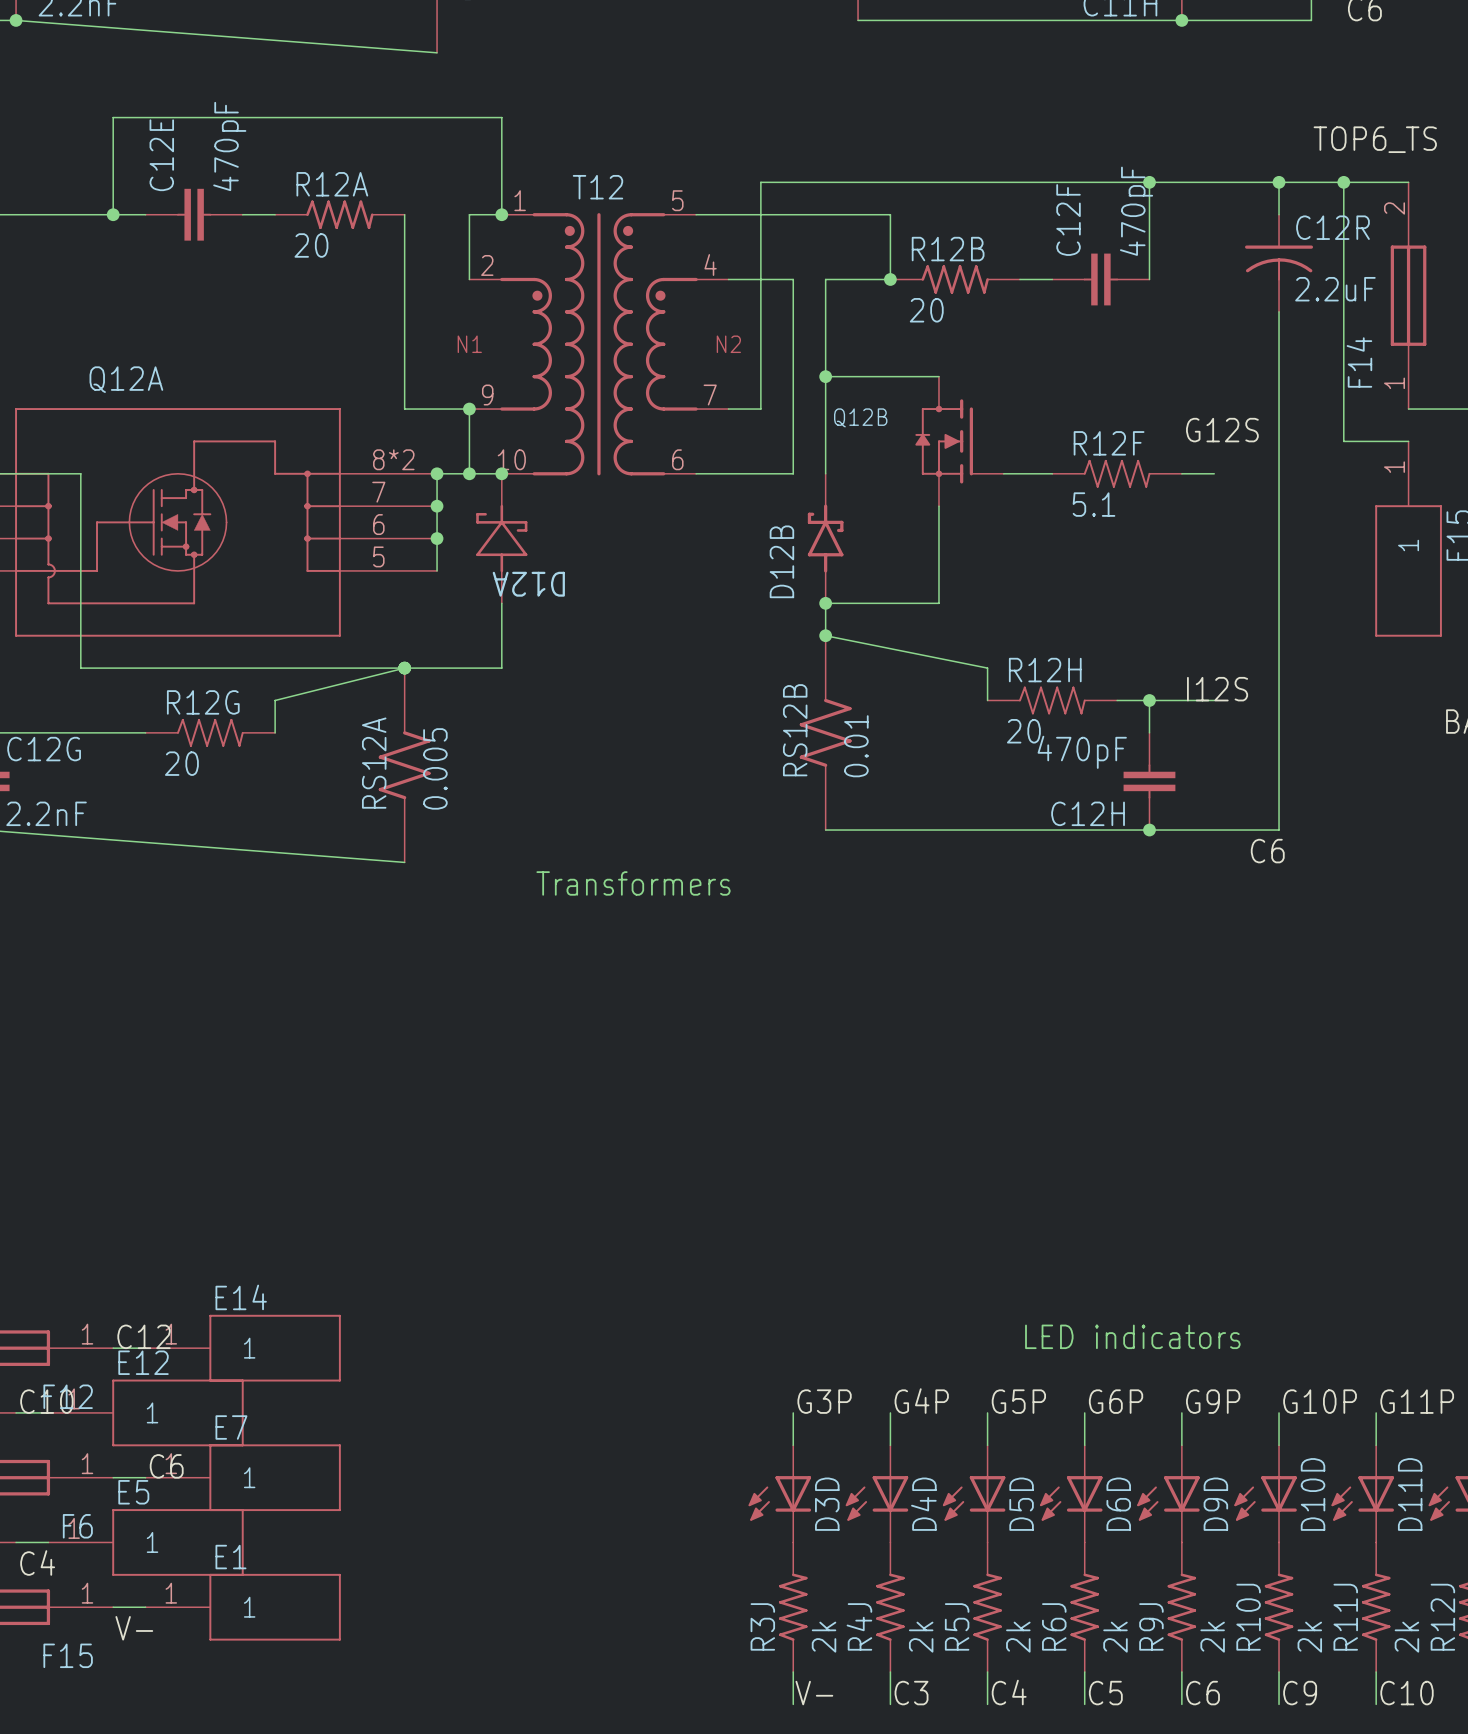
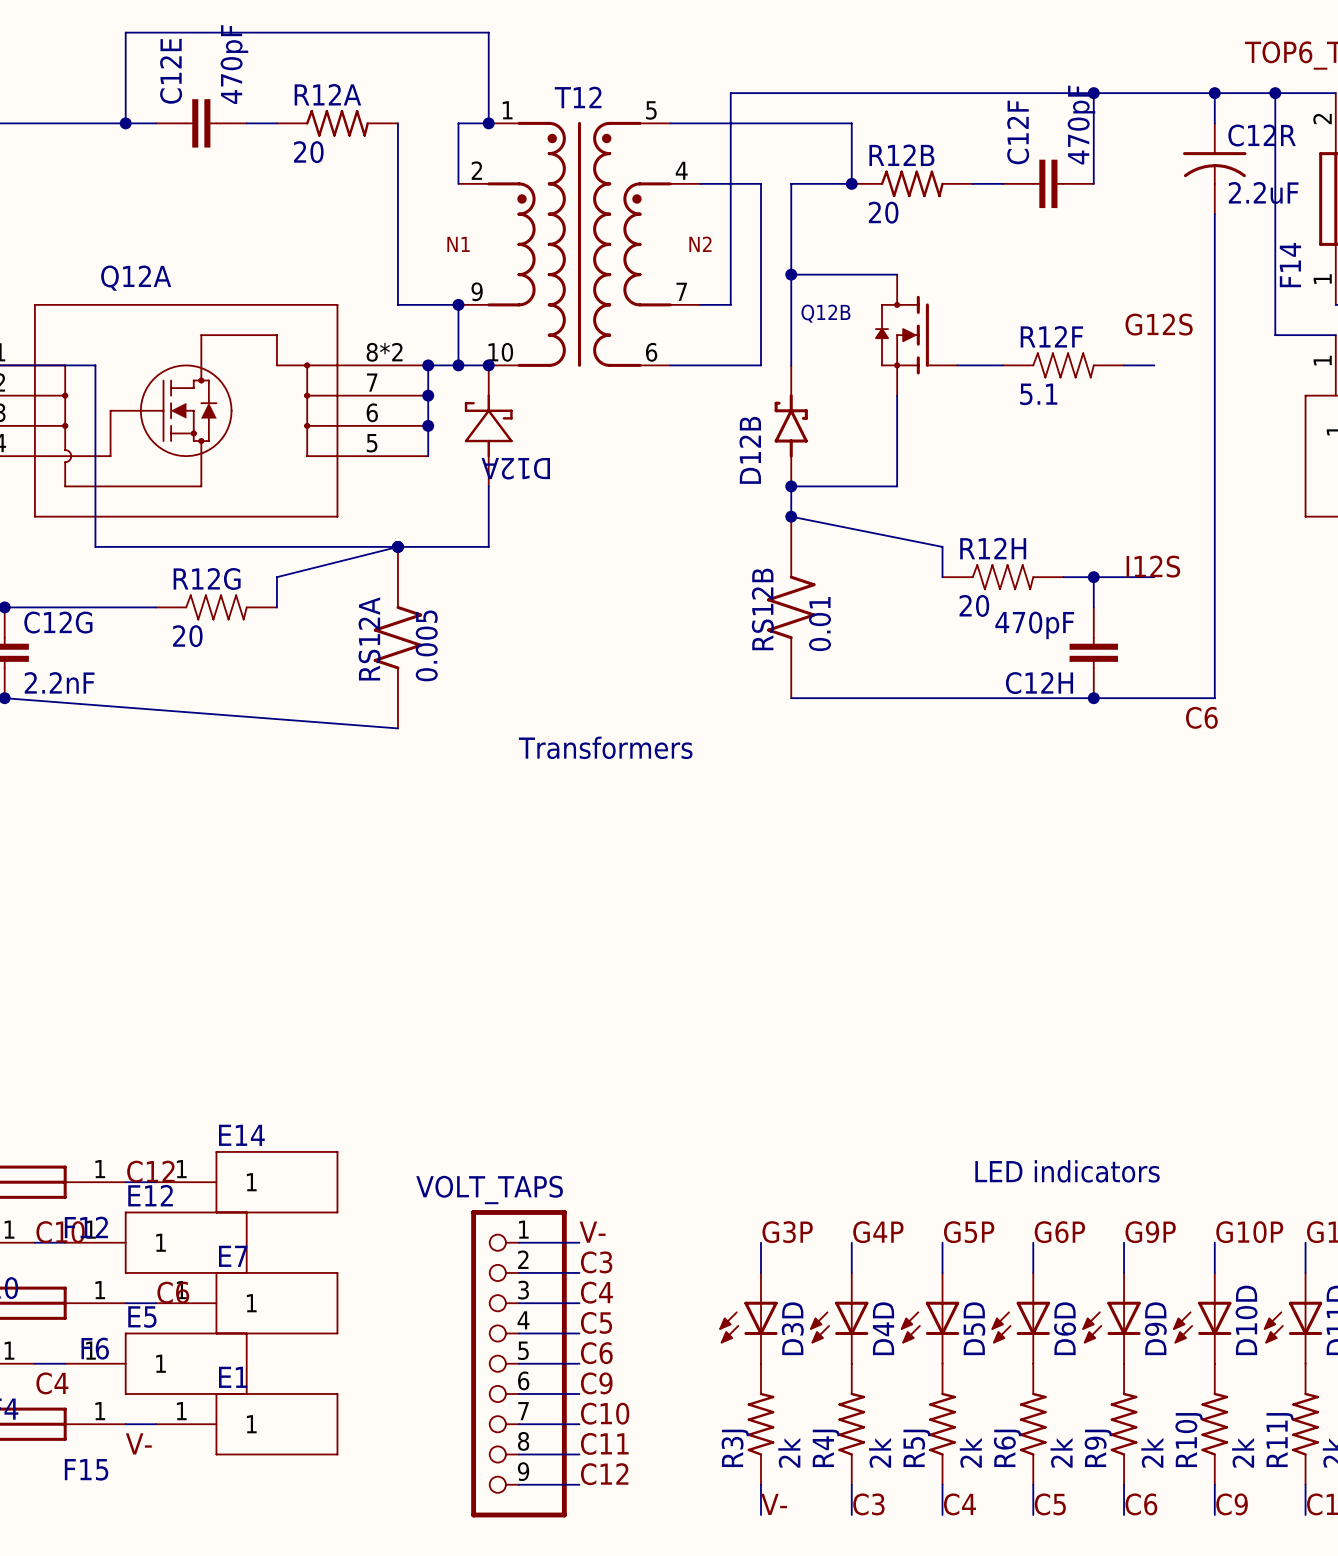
label: none -> V- (592, 1232)
wire: none -> (518, 1242) (579, 1242)
label: none -> C3 (596, 1262)
wire: none -> (518, 1272) (579, 1272)
label: none -> C4 (596, 1292)
wire: none -> (518, 1303) (579, 1303)
label: none -> C5 (596, 1322)
wire: none -> (518, 1333) (579, 1333)
label: none -> C6 (596, 1353)
wire: none -> (518, 1363) (579, 1363)
VOLT_TAPS: none -> (518, 1363)
label: none -> C9 (596, 1383)
wire: none -> (518, 1393) (579, 1393)
label: none -> C10 (605, 1413)
wire: none -> (518, 1424) (579, 1424)
label: none -> C11 (604, 1443)
wire: none -> (518, 1454) (579, 1454)
label: none -> C12 (604, 1474)
wire: none -> (518, 1484) (579, 1484)

